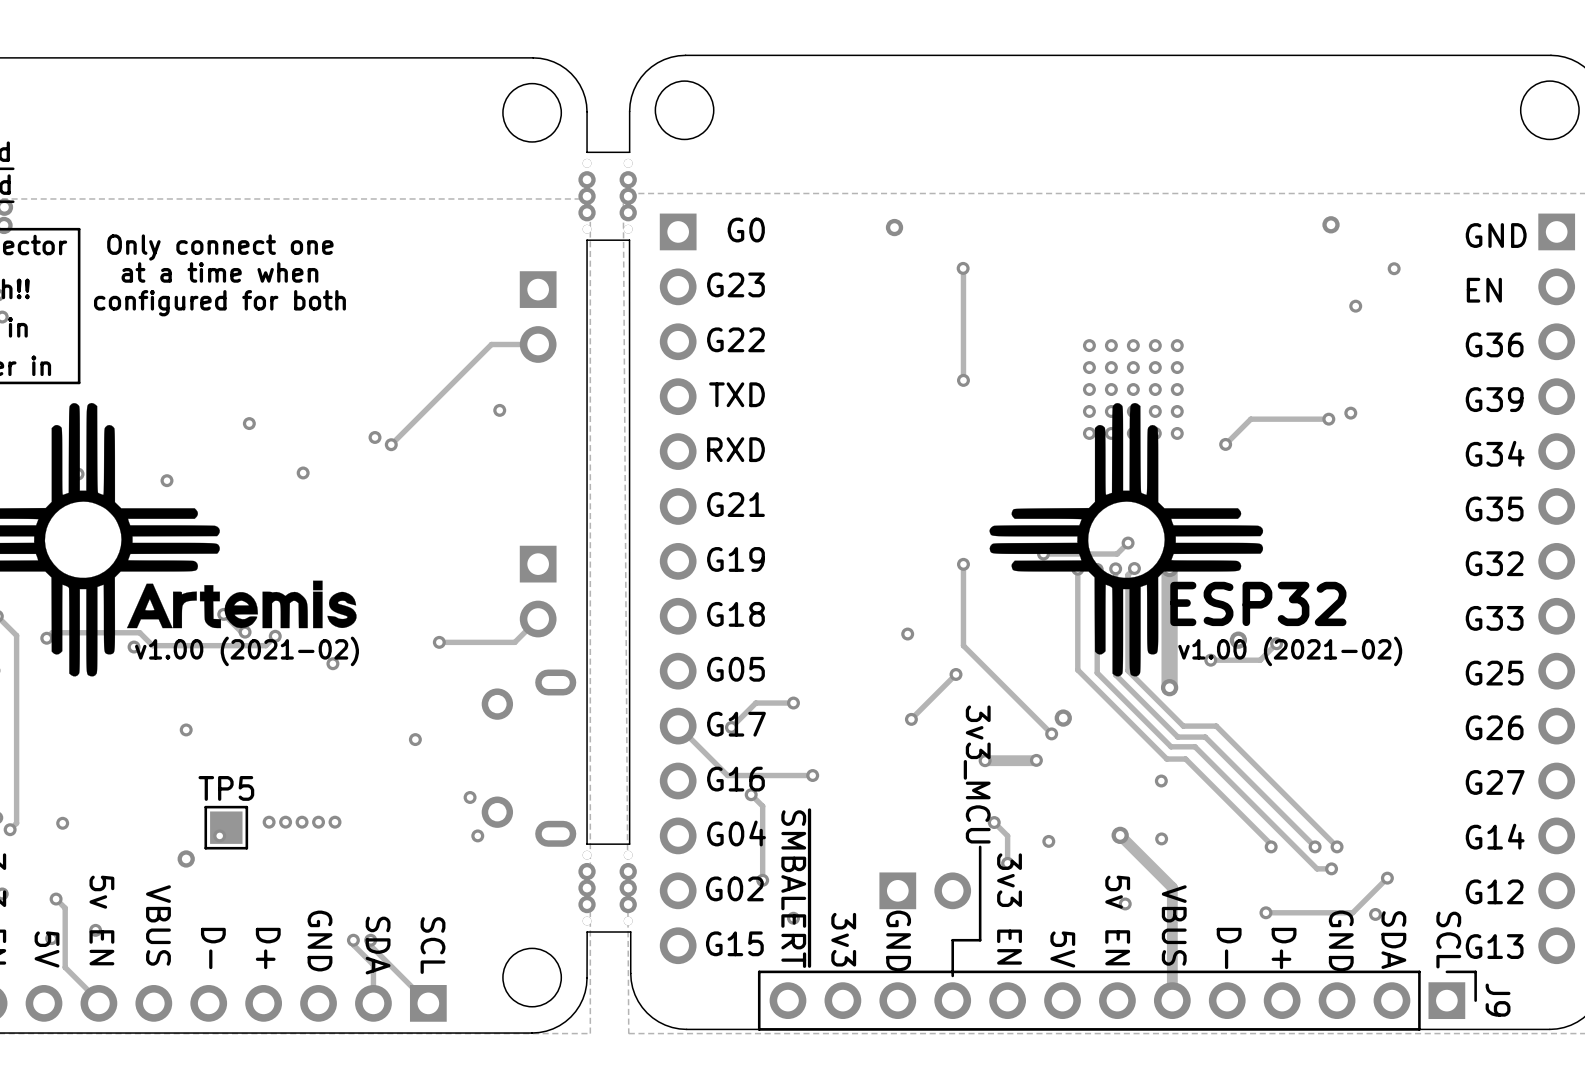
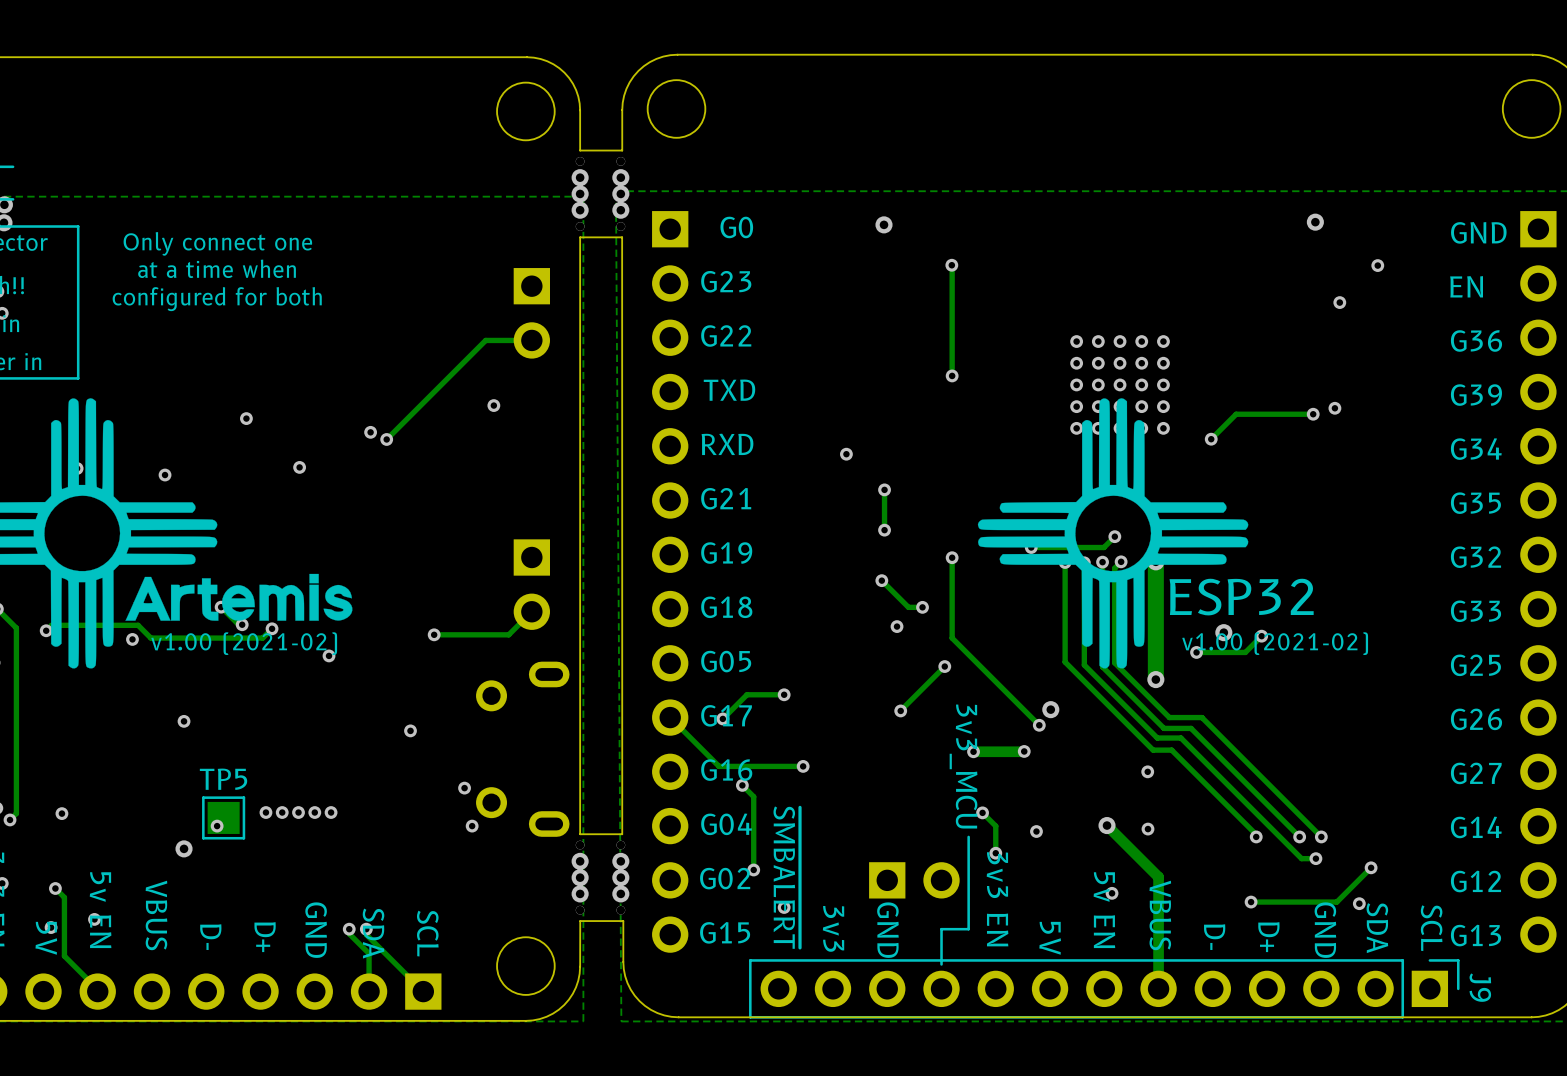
via: none -> (846, 454)
track: none -> (884, 489) (884, 530)
via: none -> (884, 489)
via: none -> (884, 530)
track: none -> (881, 580) (908, 607) (922, 607)
via: none -> (881, 580)
via: none -> (922, 607)

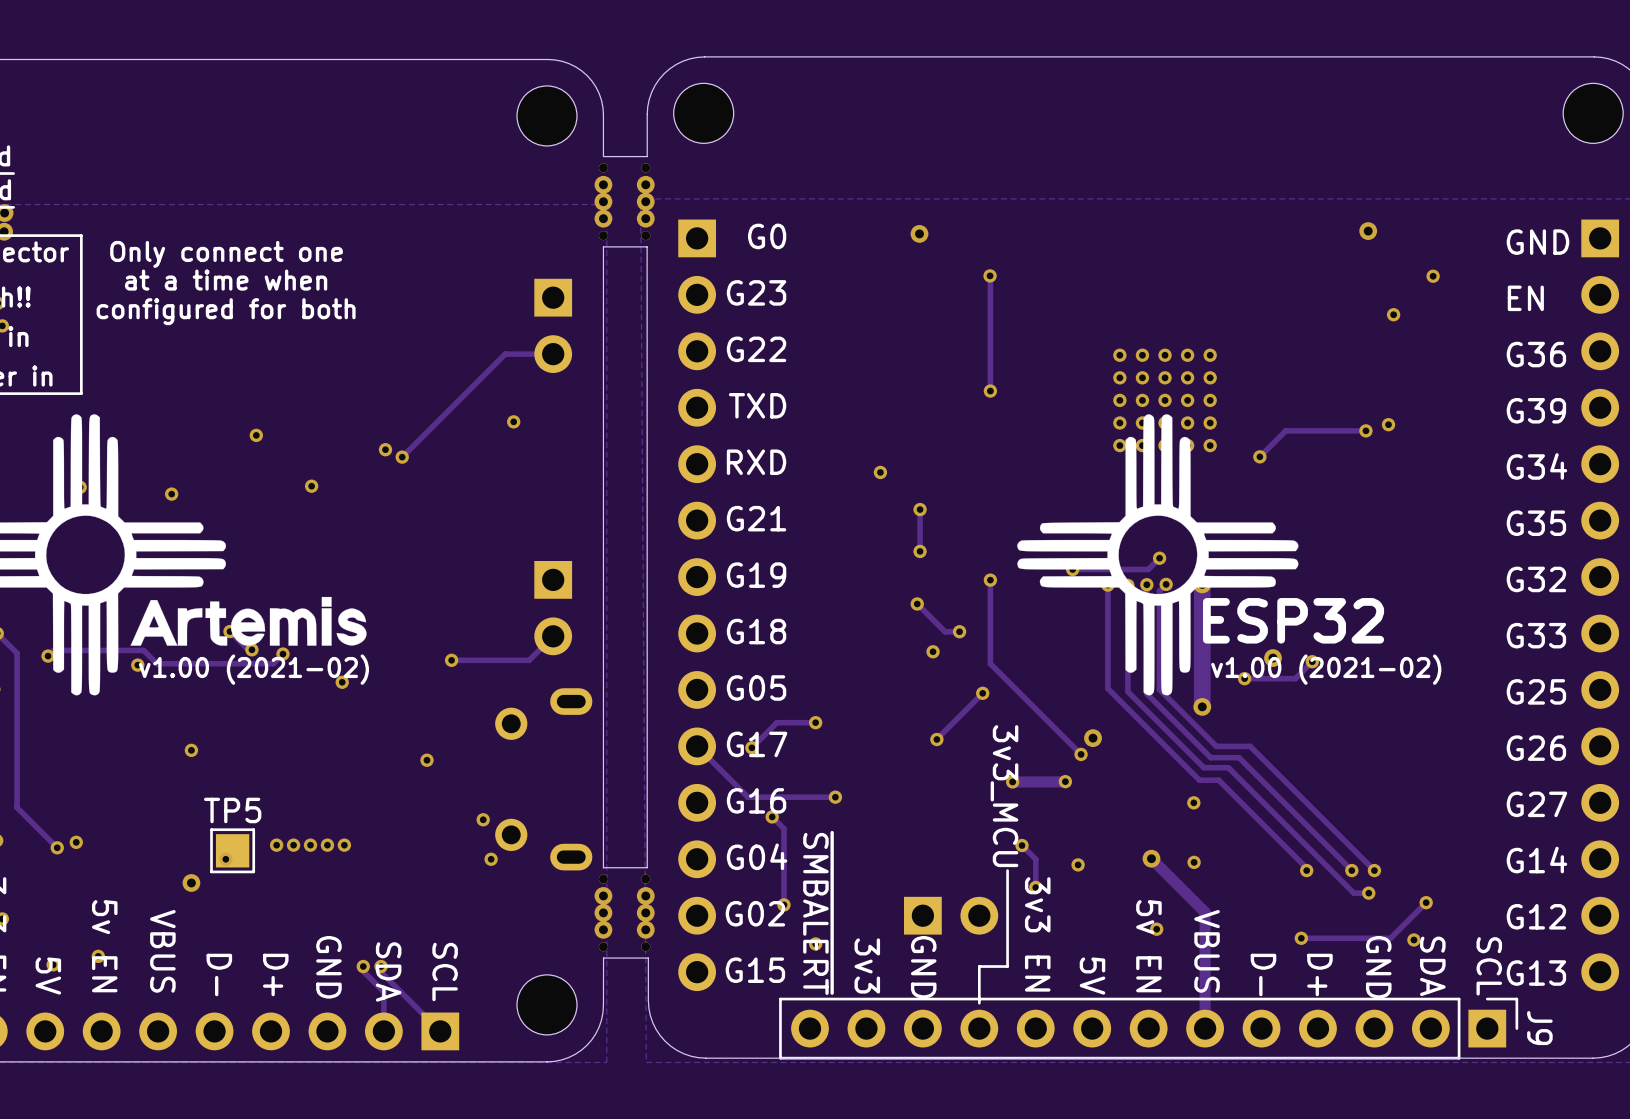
track: (16, 776) (16, 813) (10, 819) -> (17, 807) (57, 847)
via: none -> (76, 842)
via: (61, 813) -> none
via: none -> (57, 847)
via: (10, 819) -> none
track: (55, 888) (64, 897) (64, 956) (99, 991) -> none
via: (55, 888) -> none

